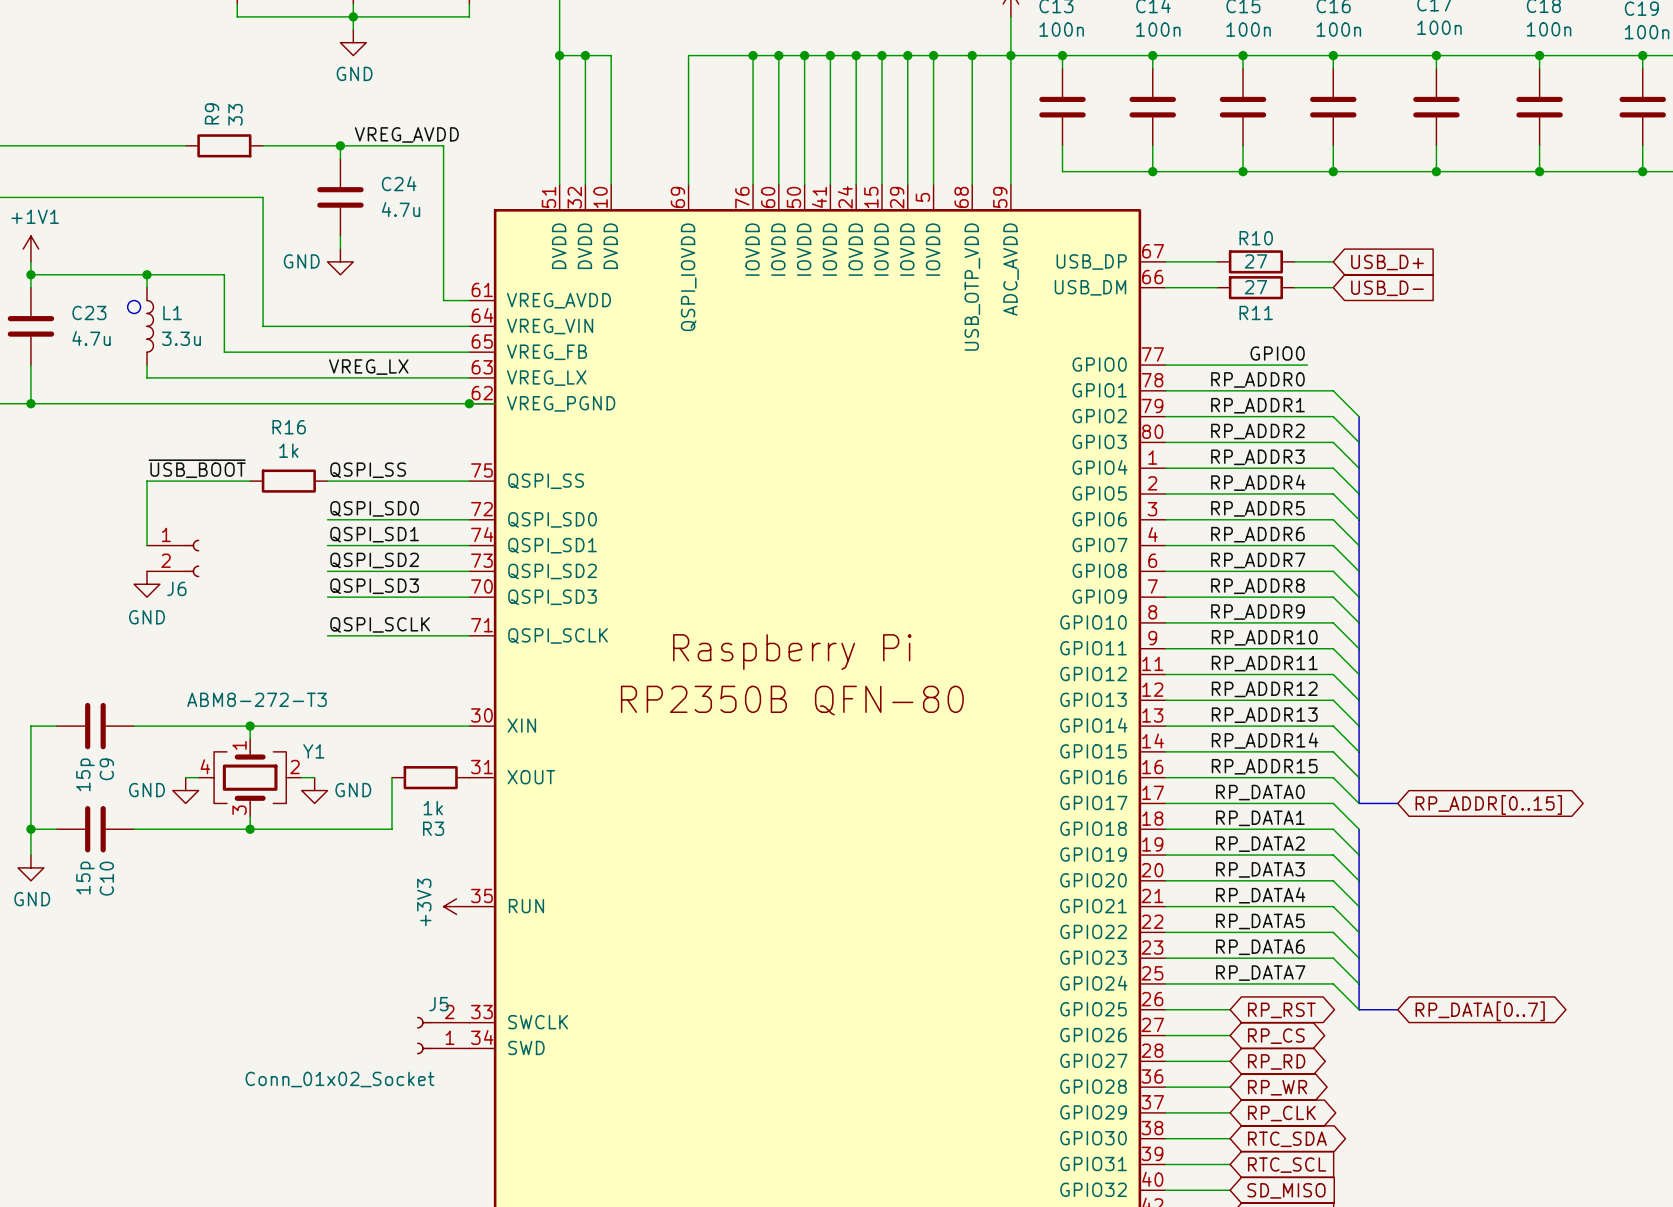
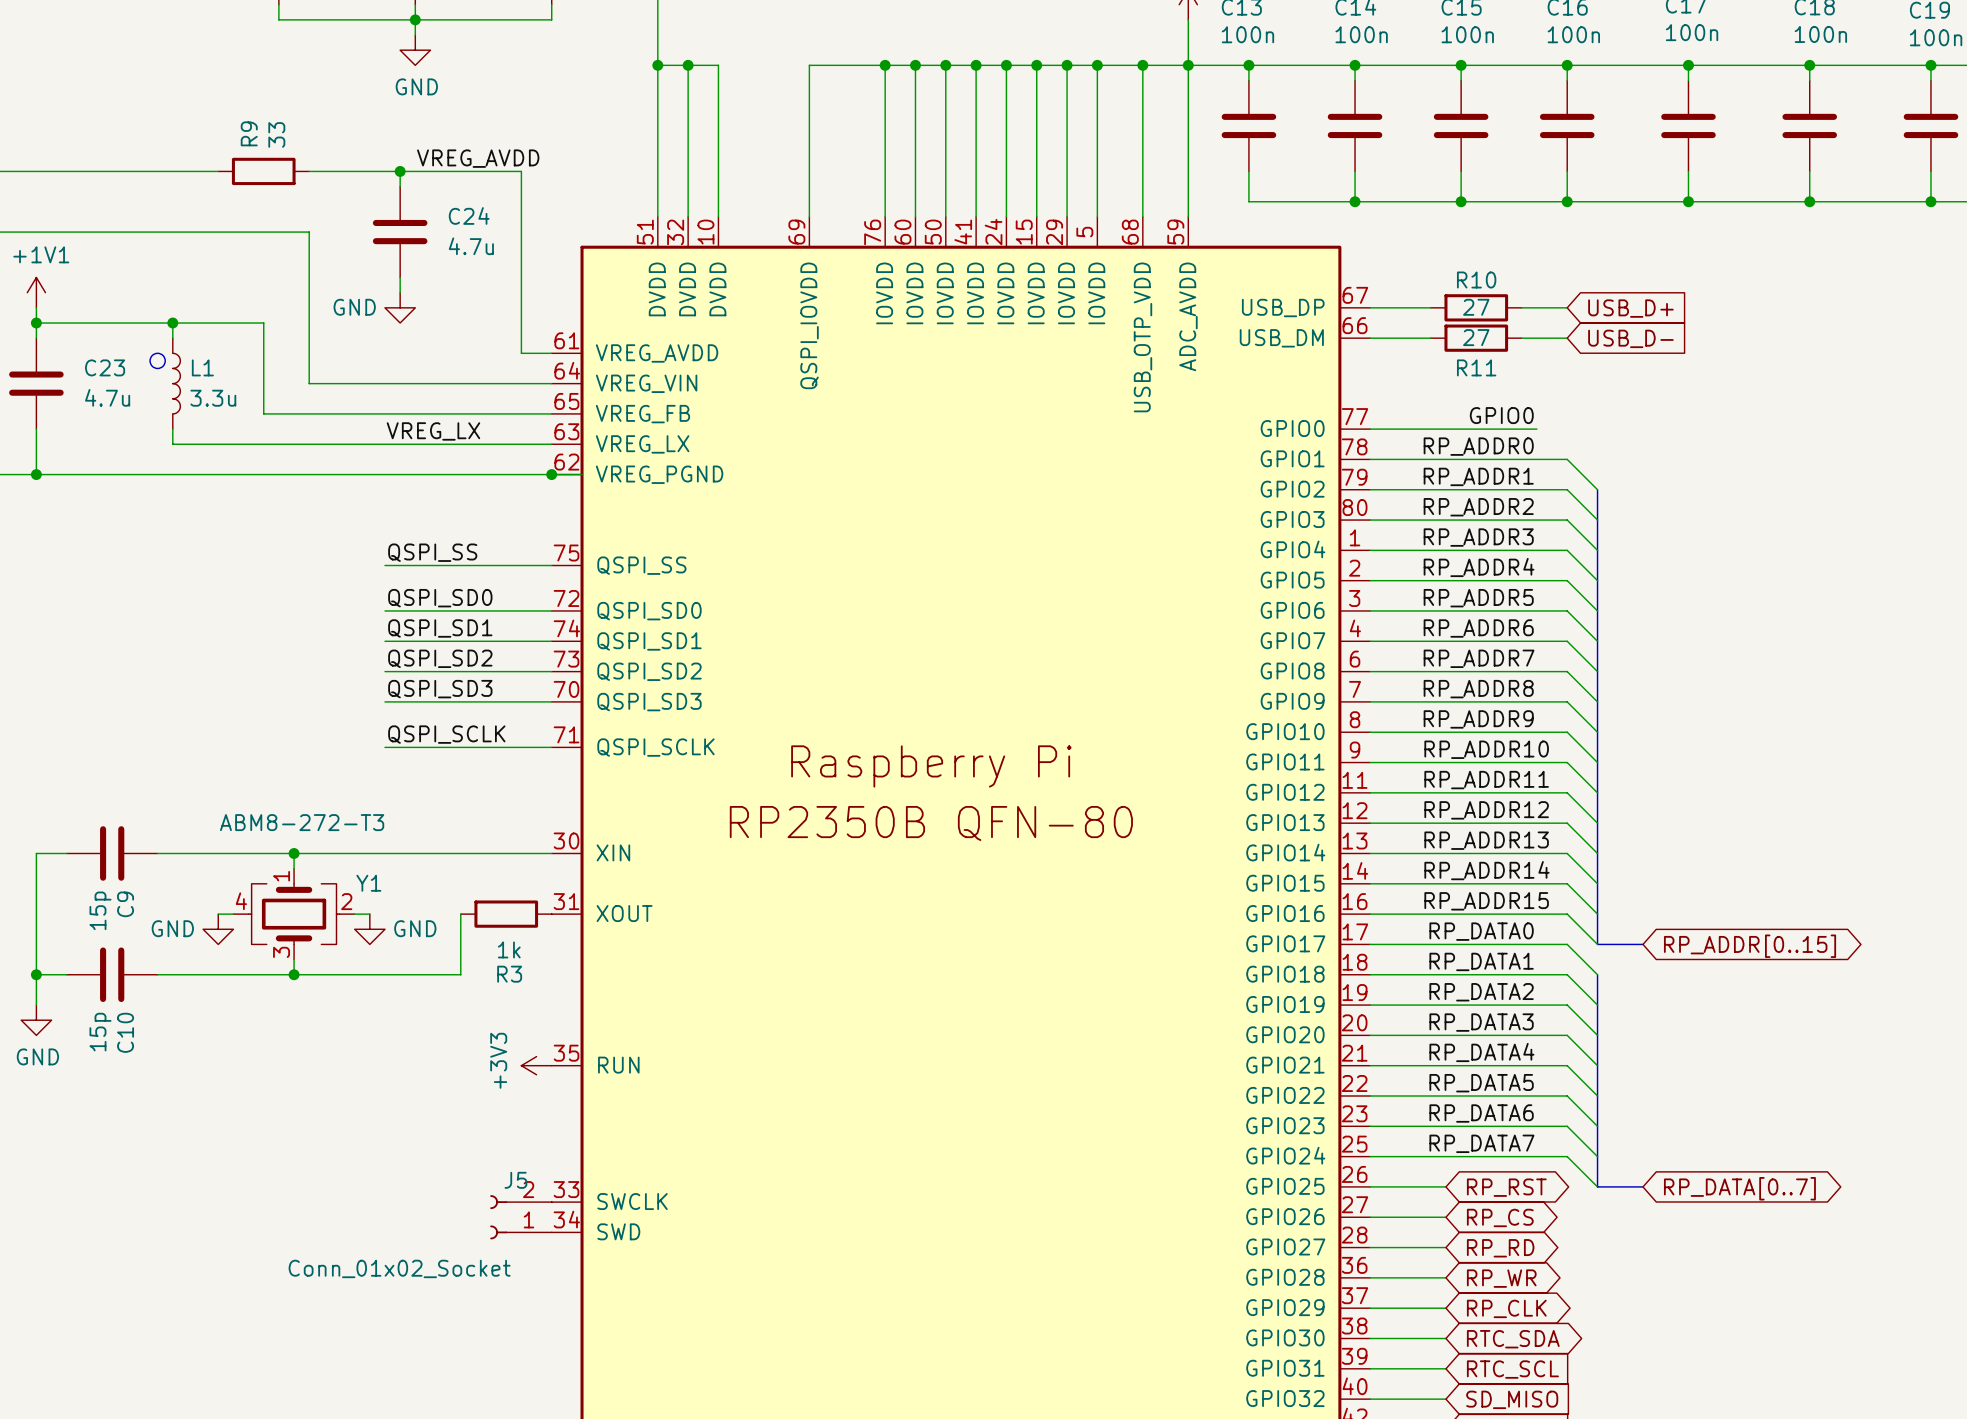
label: ~{USB_BOOT} (197, 468) -> none
wire: (250, 481) (147, 481) (147, 545) -> none
R16: 1k (288, 481) -> none
J6: (173, 558) -> none
power symbol: GND (147, 584) -> none

